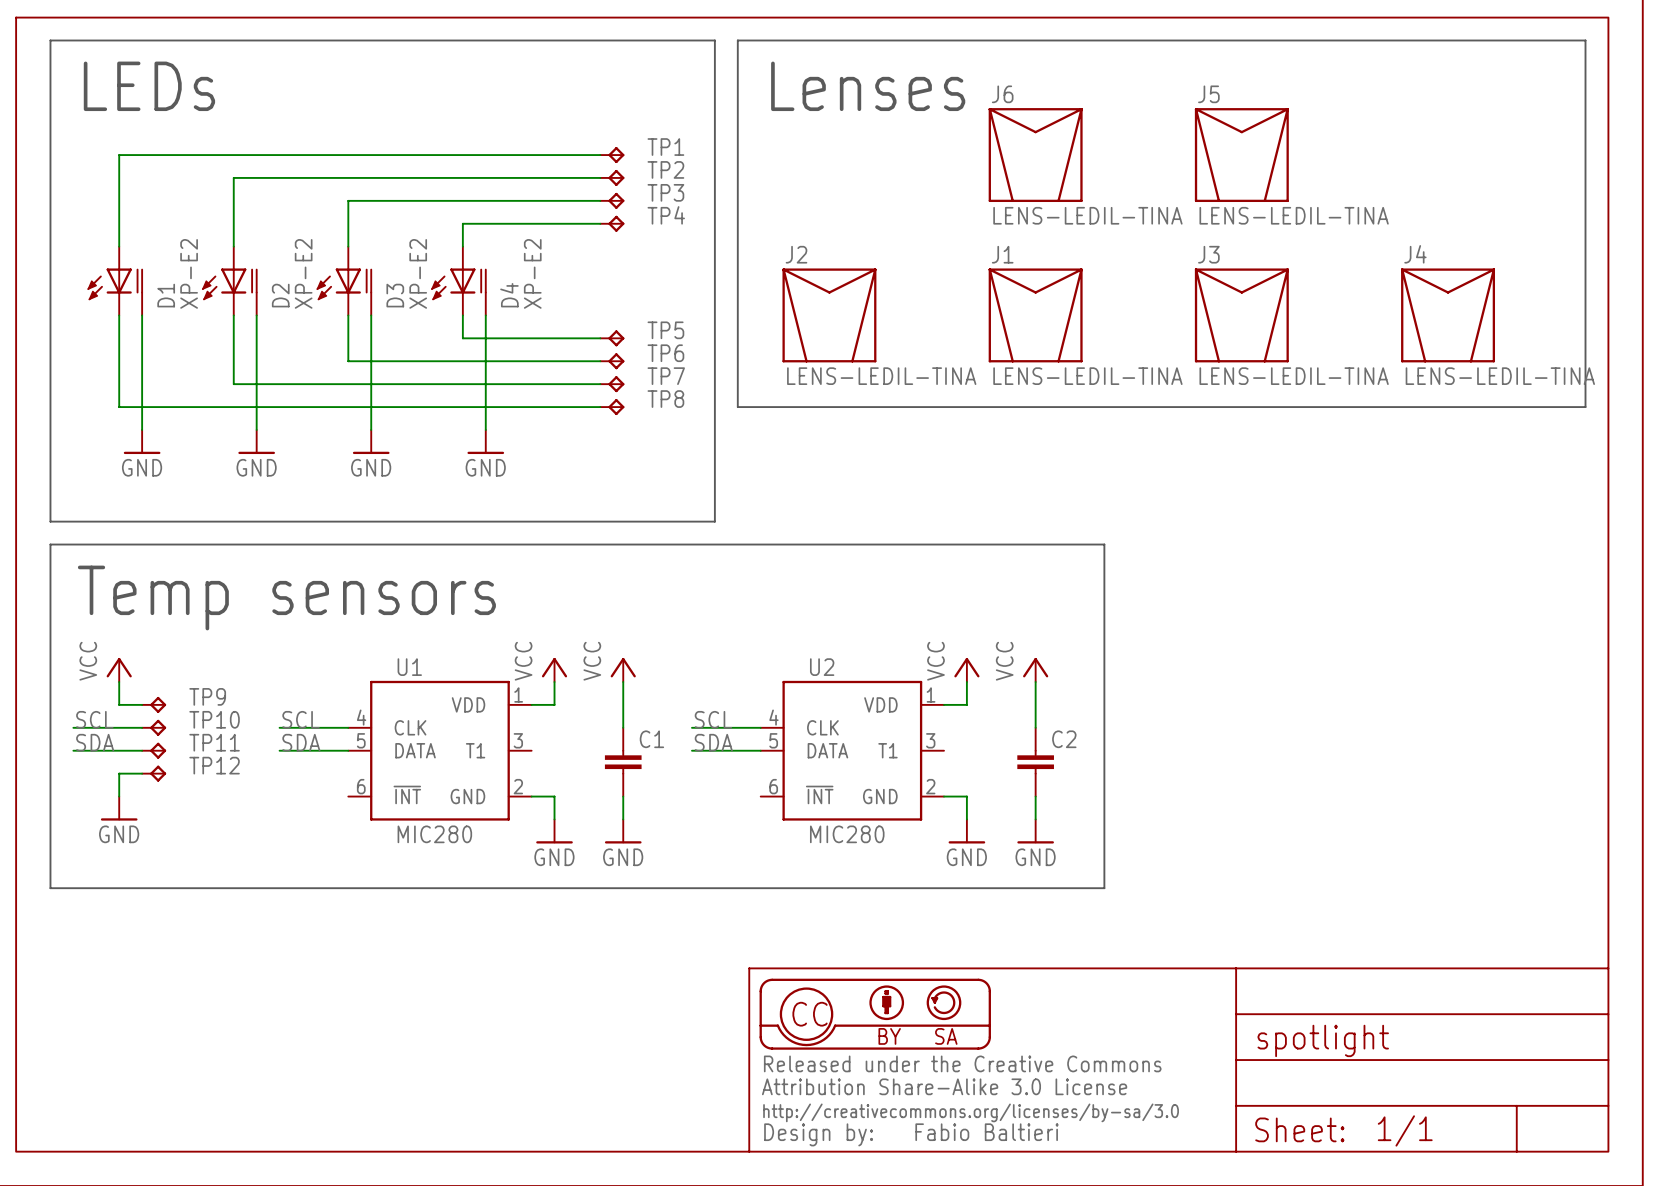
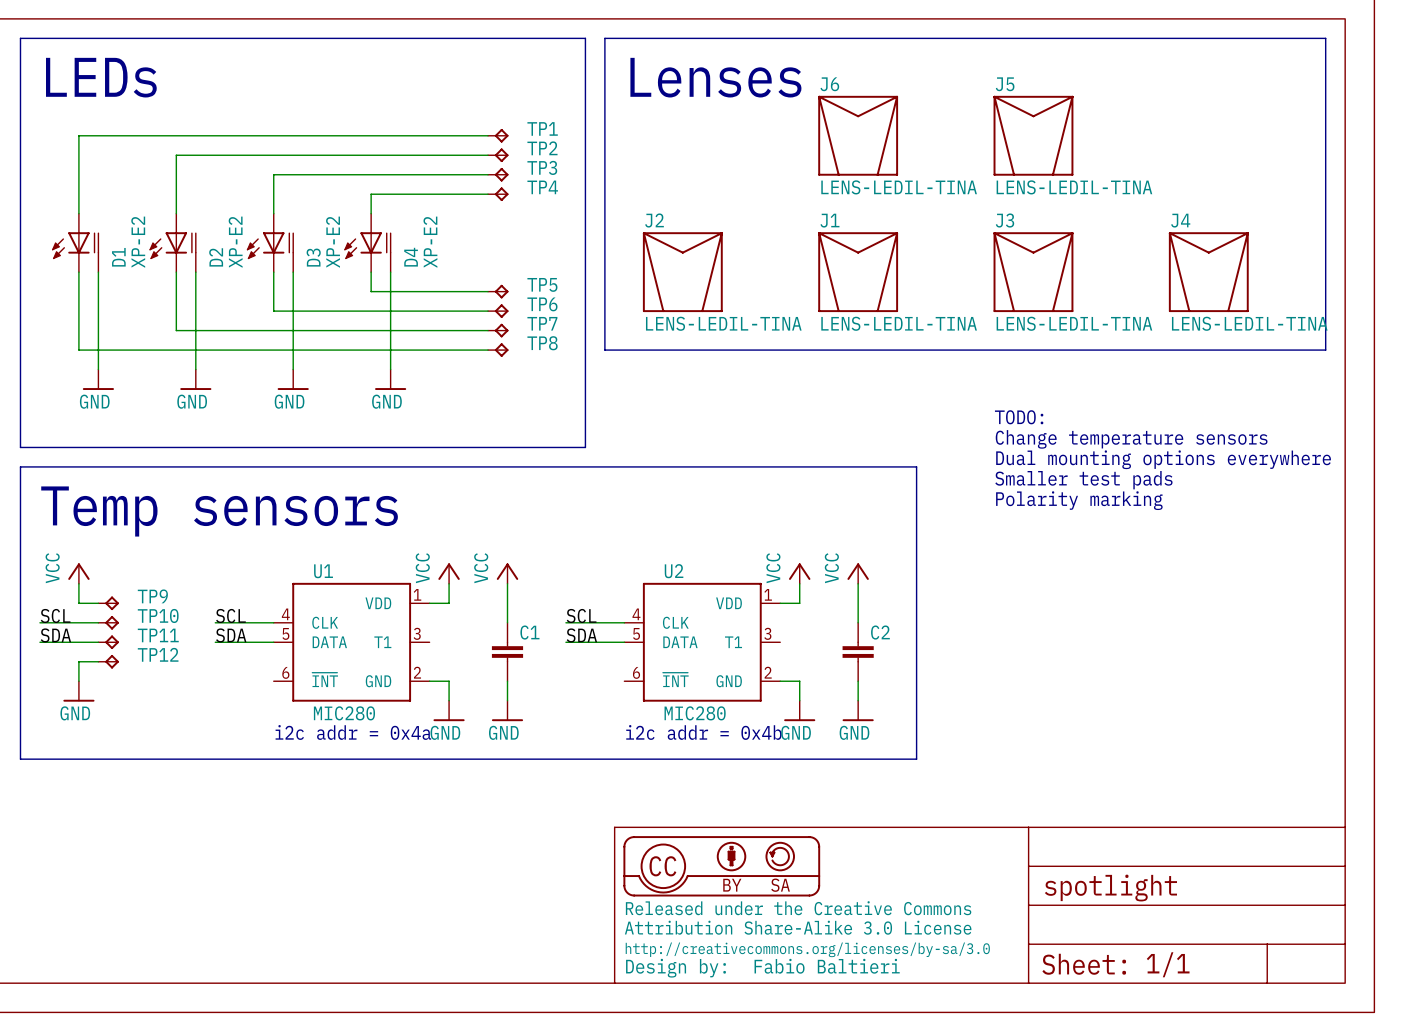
text: none -> TODO: (1019, 417)
text: none -> Change temperature sensors (1131, 439)
text: none -> Dual mounting options everywhere (1163, 459)
text: none -> Smaller test pads (1083, 480)
text: none -> Polarity marking (1079, 500)
text: none -> i2c addr = 0x4a (353, 732)
text: none -> i2c addr = 0x4b (703, 732)

